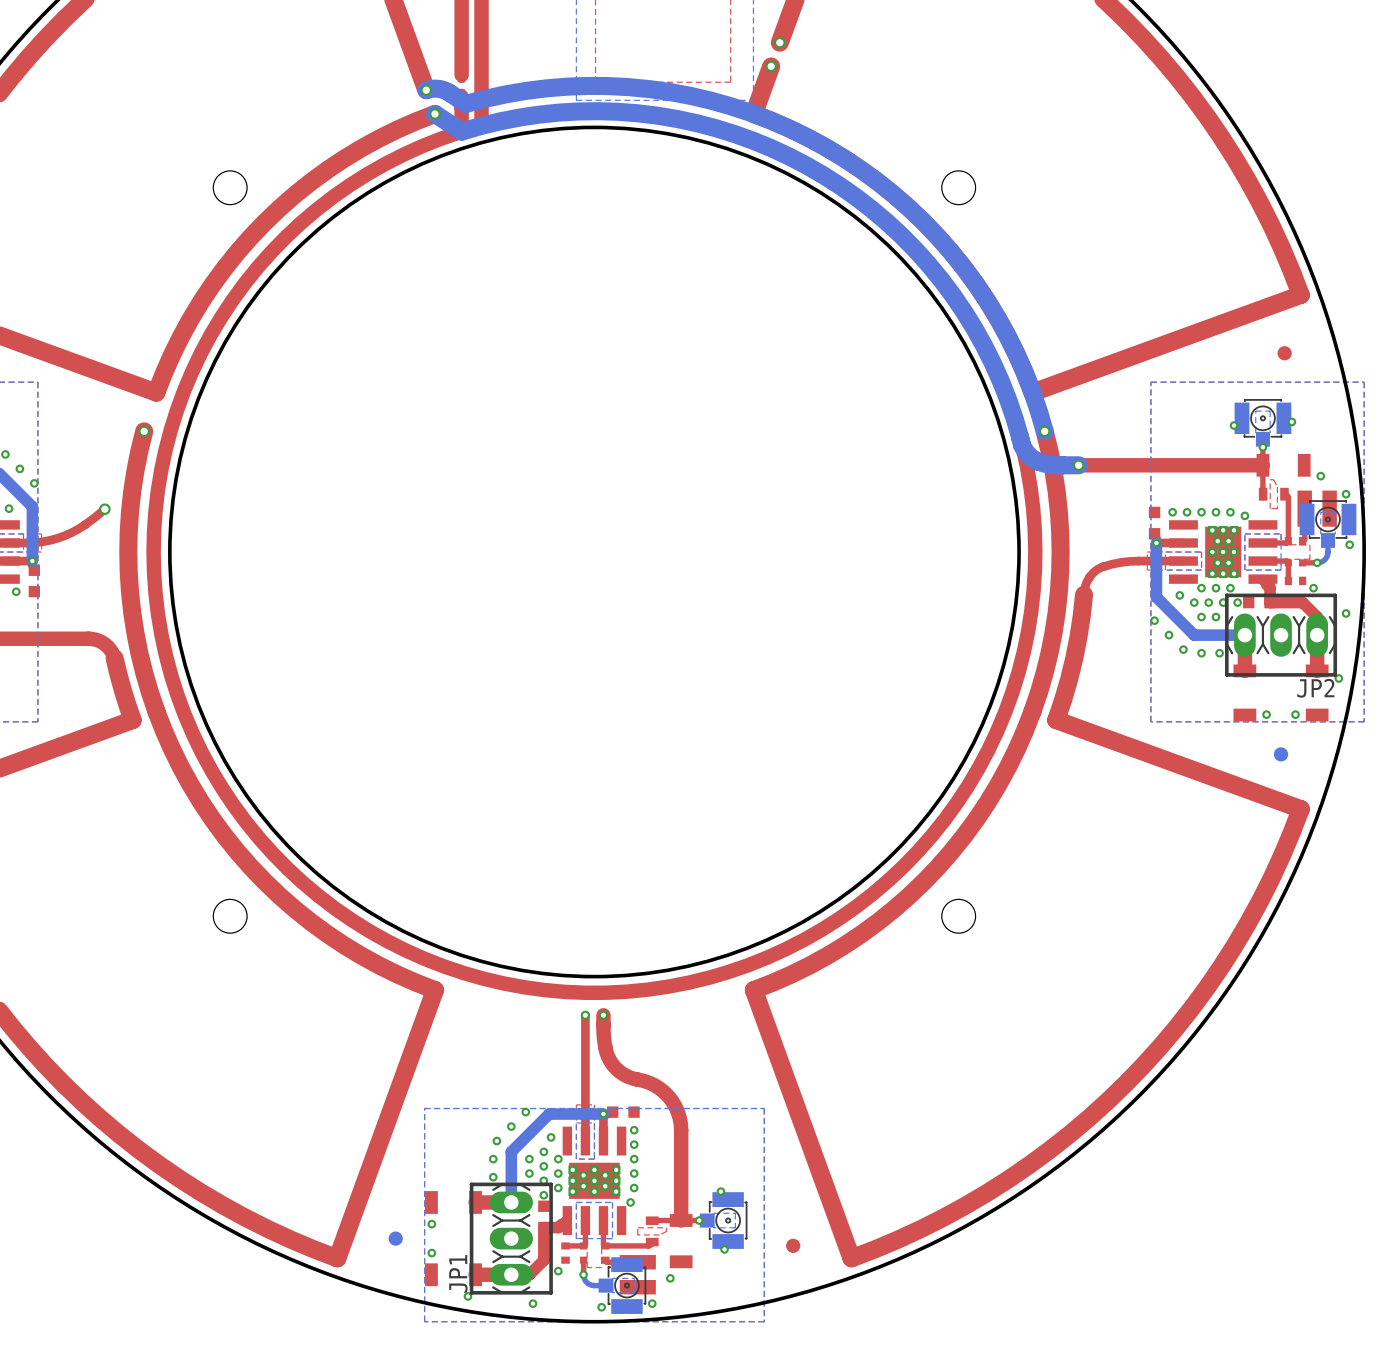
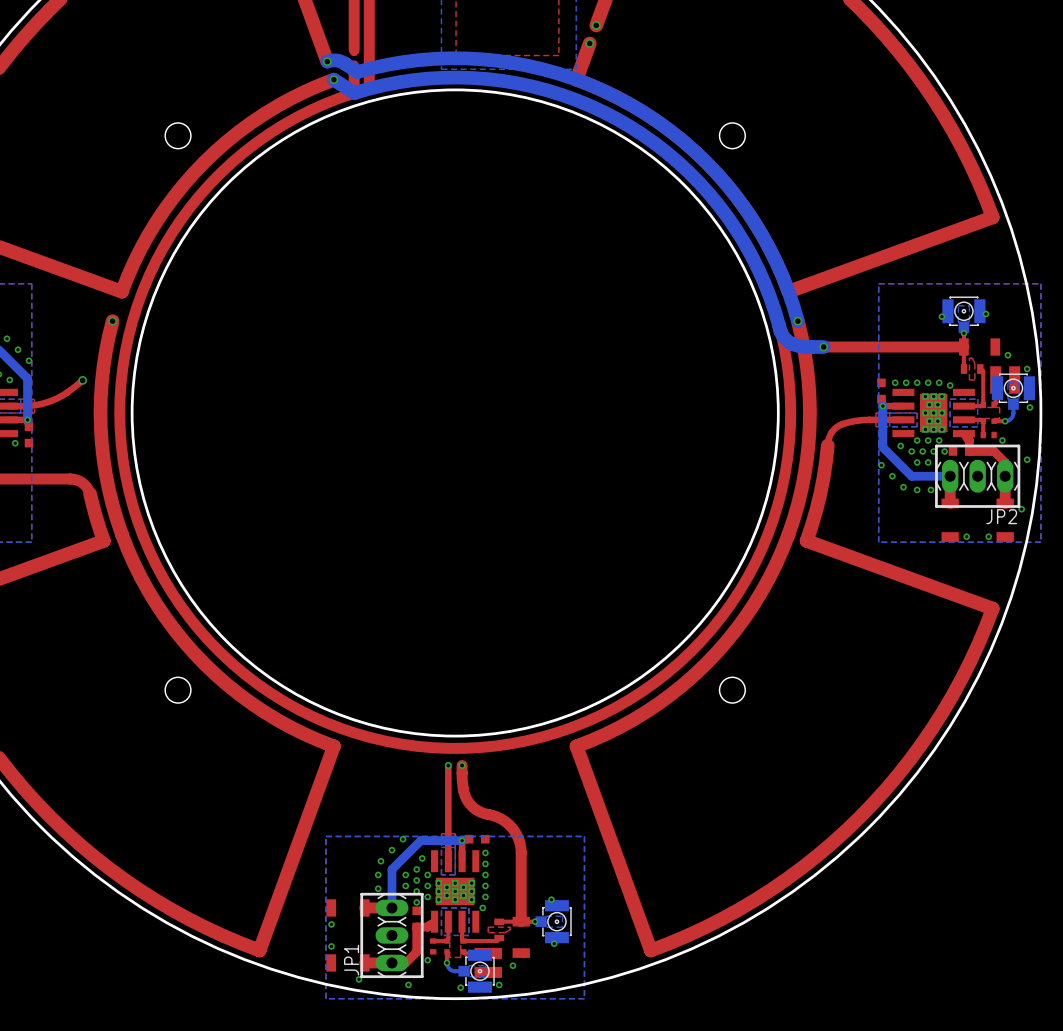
part: (1284, 353) -> none
part: (1281, 754) -> none
part: (395, 1238) -> none
part: (793, 1245) -> none

